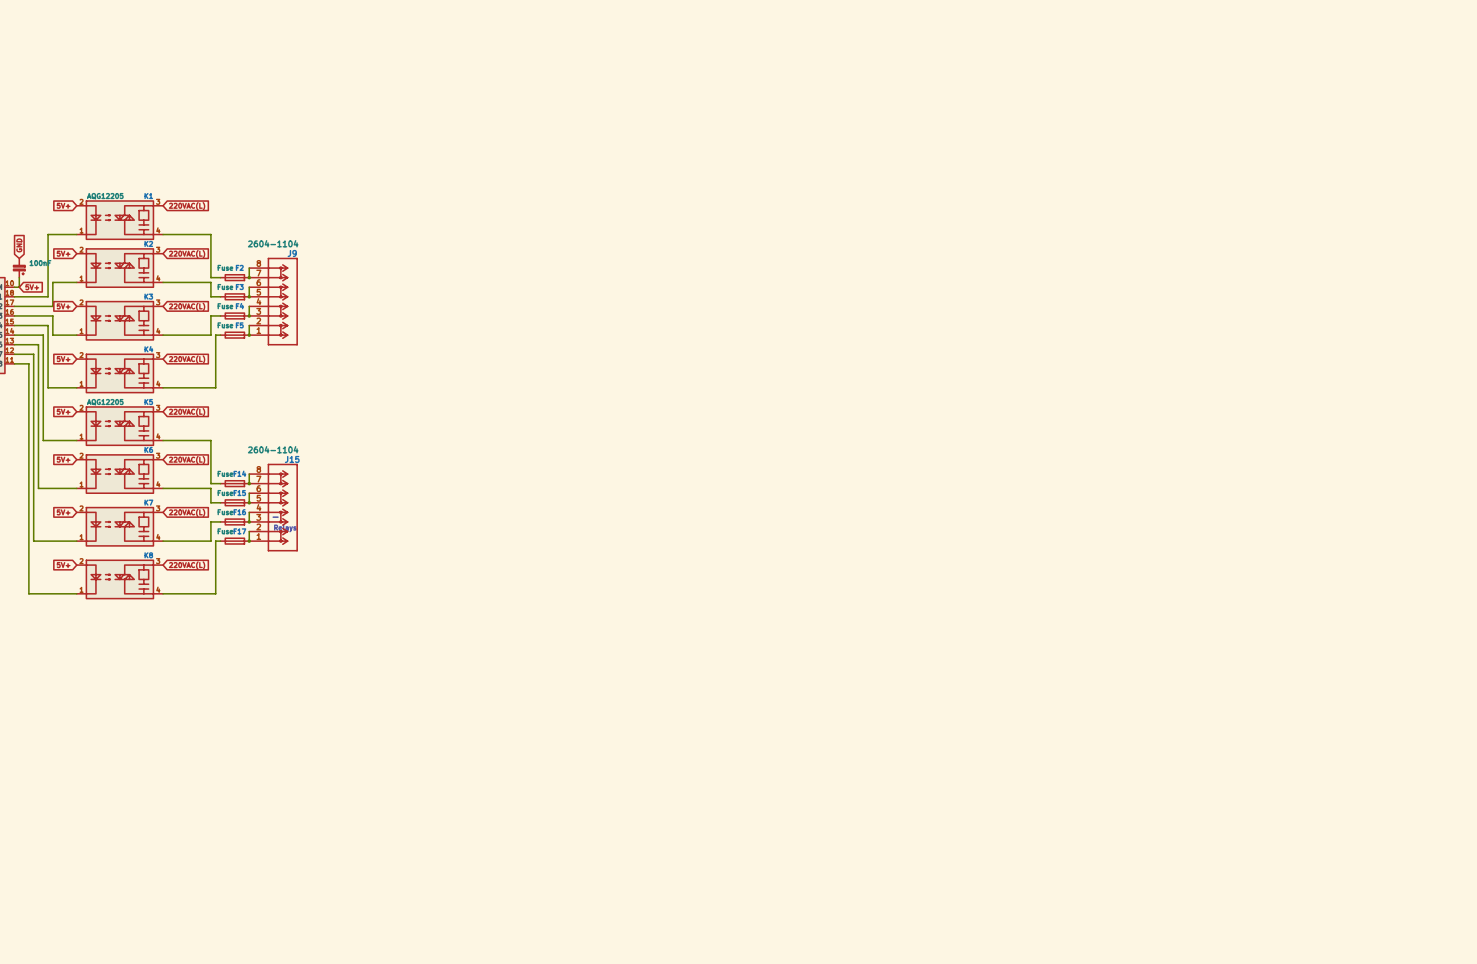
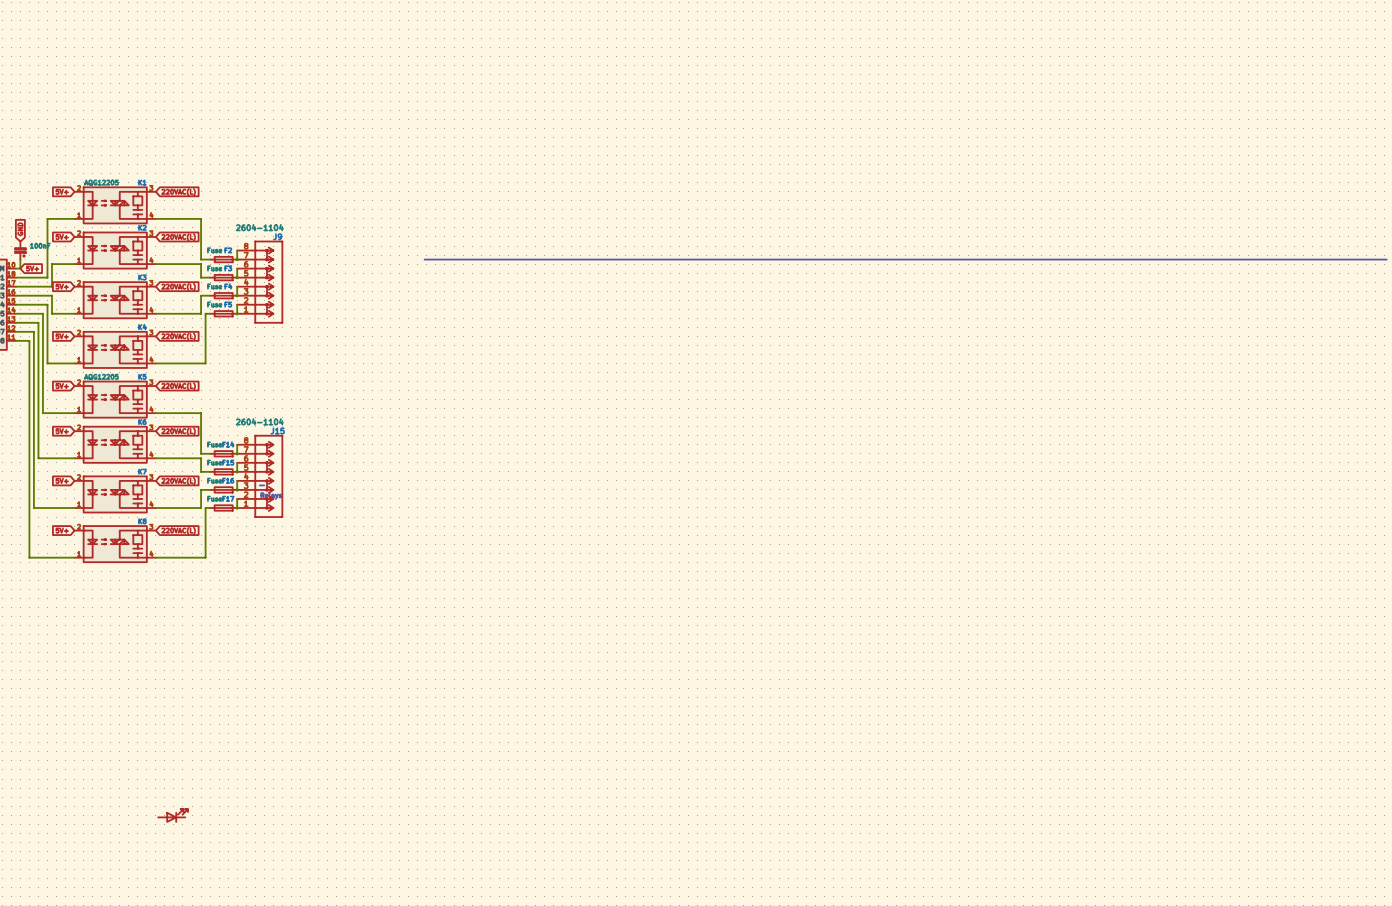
line: none -> (424, 259) (1386, 259)
part: none -> (173, 815)

